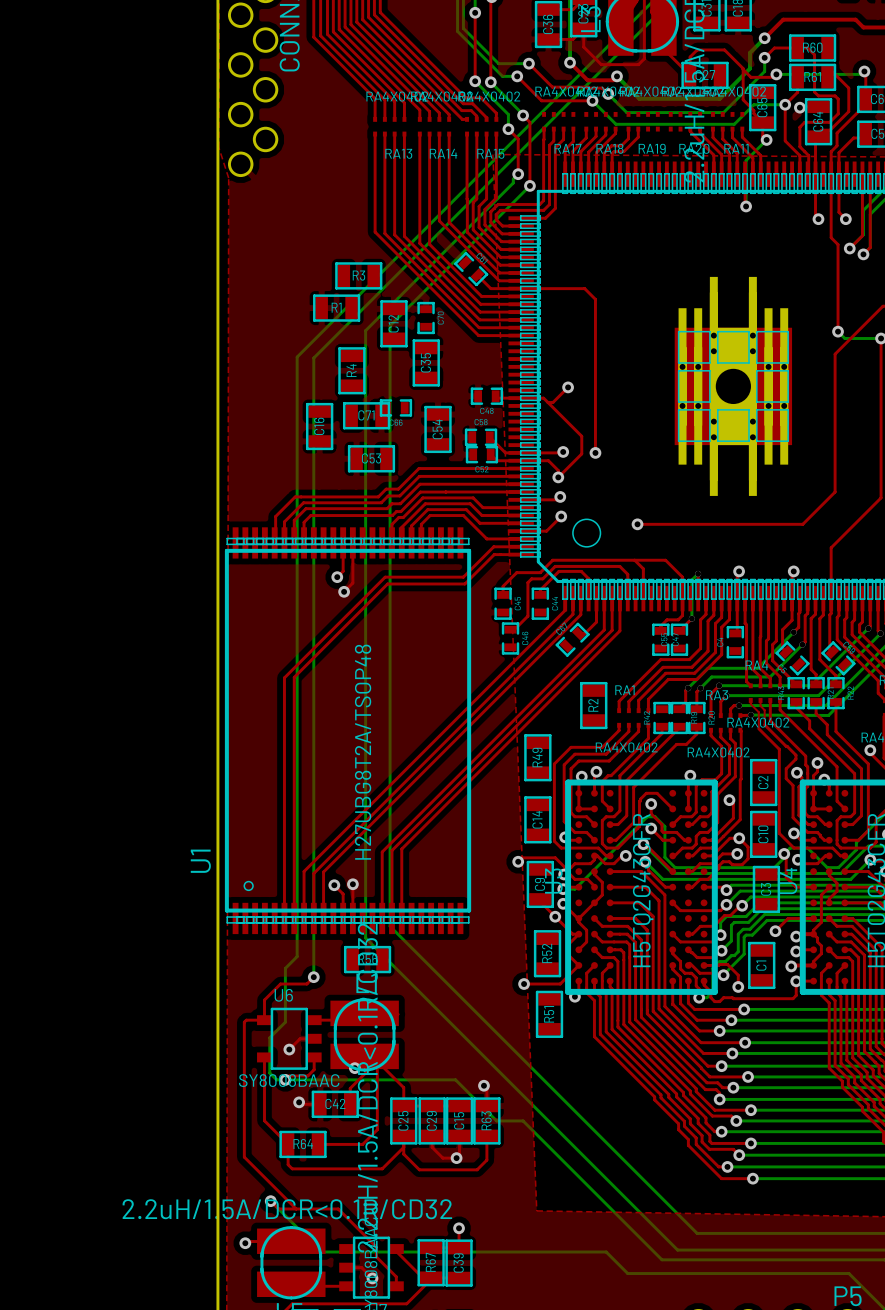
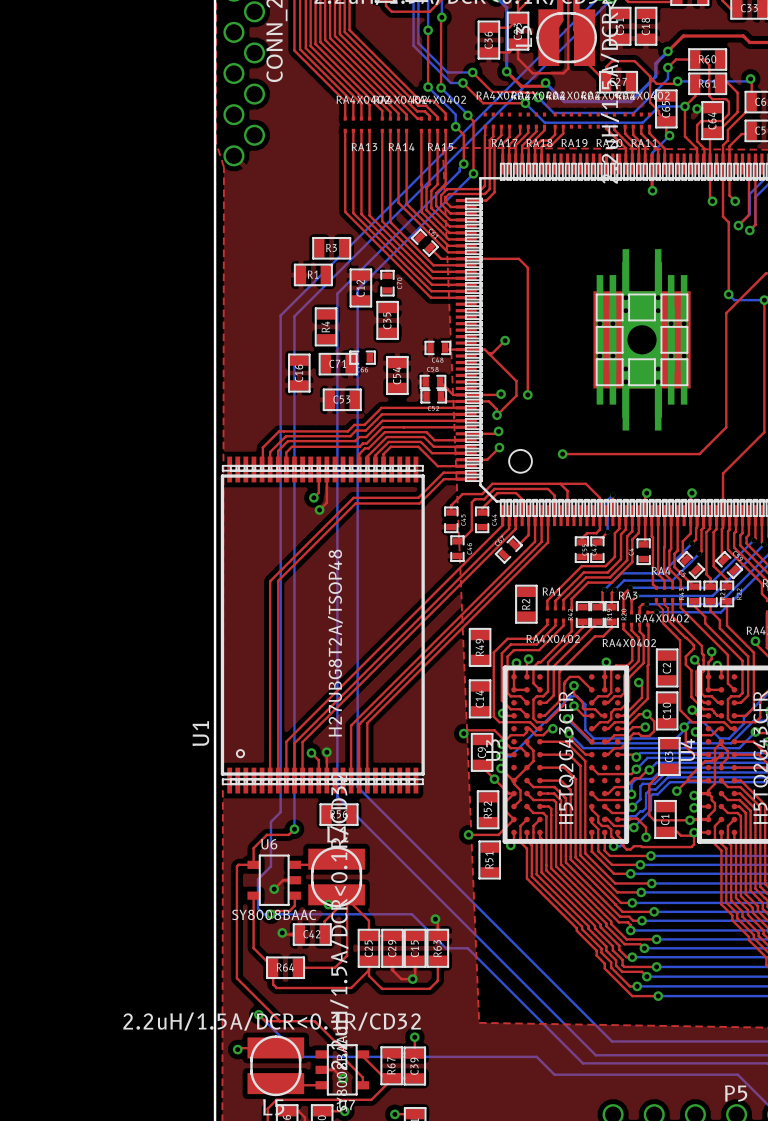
top track: none -> (721, 742) (714, 748) (714, 757) (711, 761) (705, 761) (688, 778) (688, 780)
top track: none -> (669, 768) (665, 768) (649, 784) (649, 815) (654, 820) (689, 820)
top track: none -> (665, 831) (677, 831) (680, 835) (691, 835) (694, 832)

